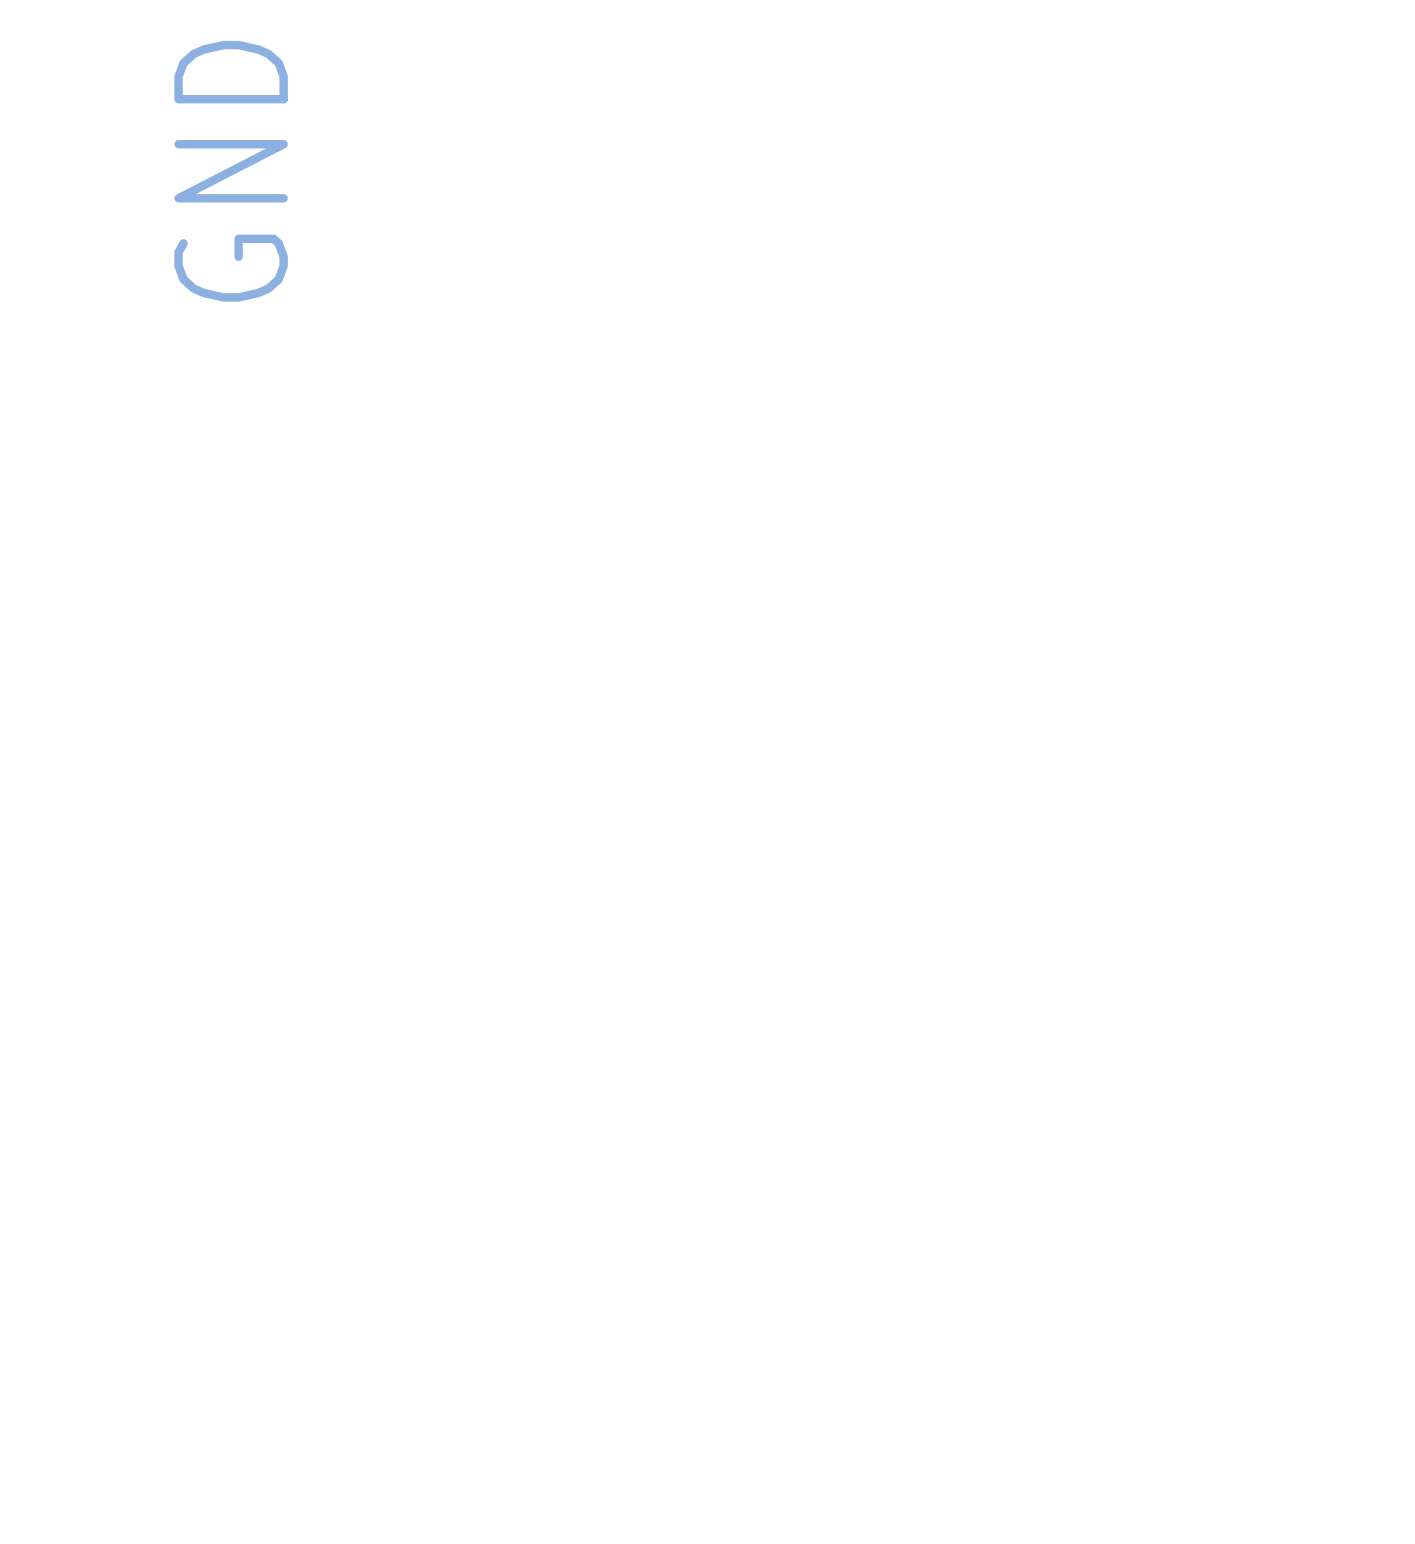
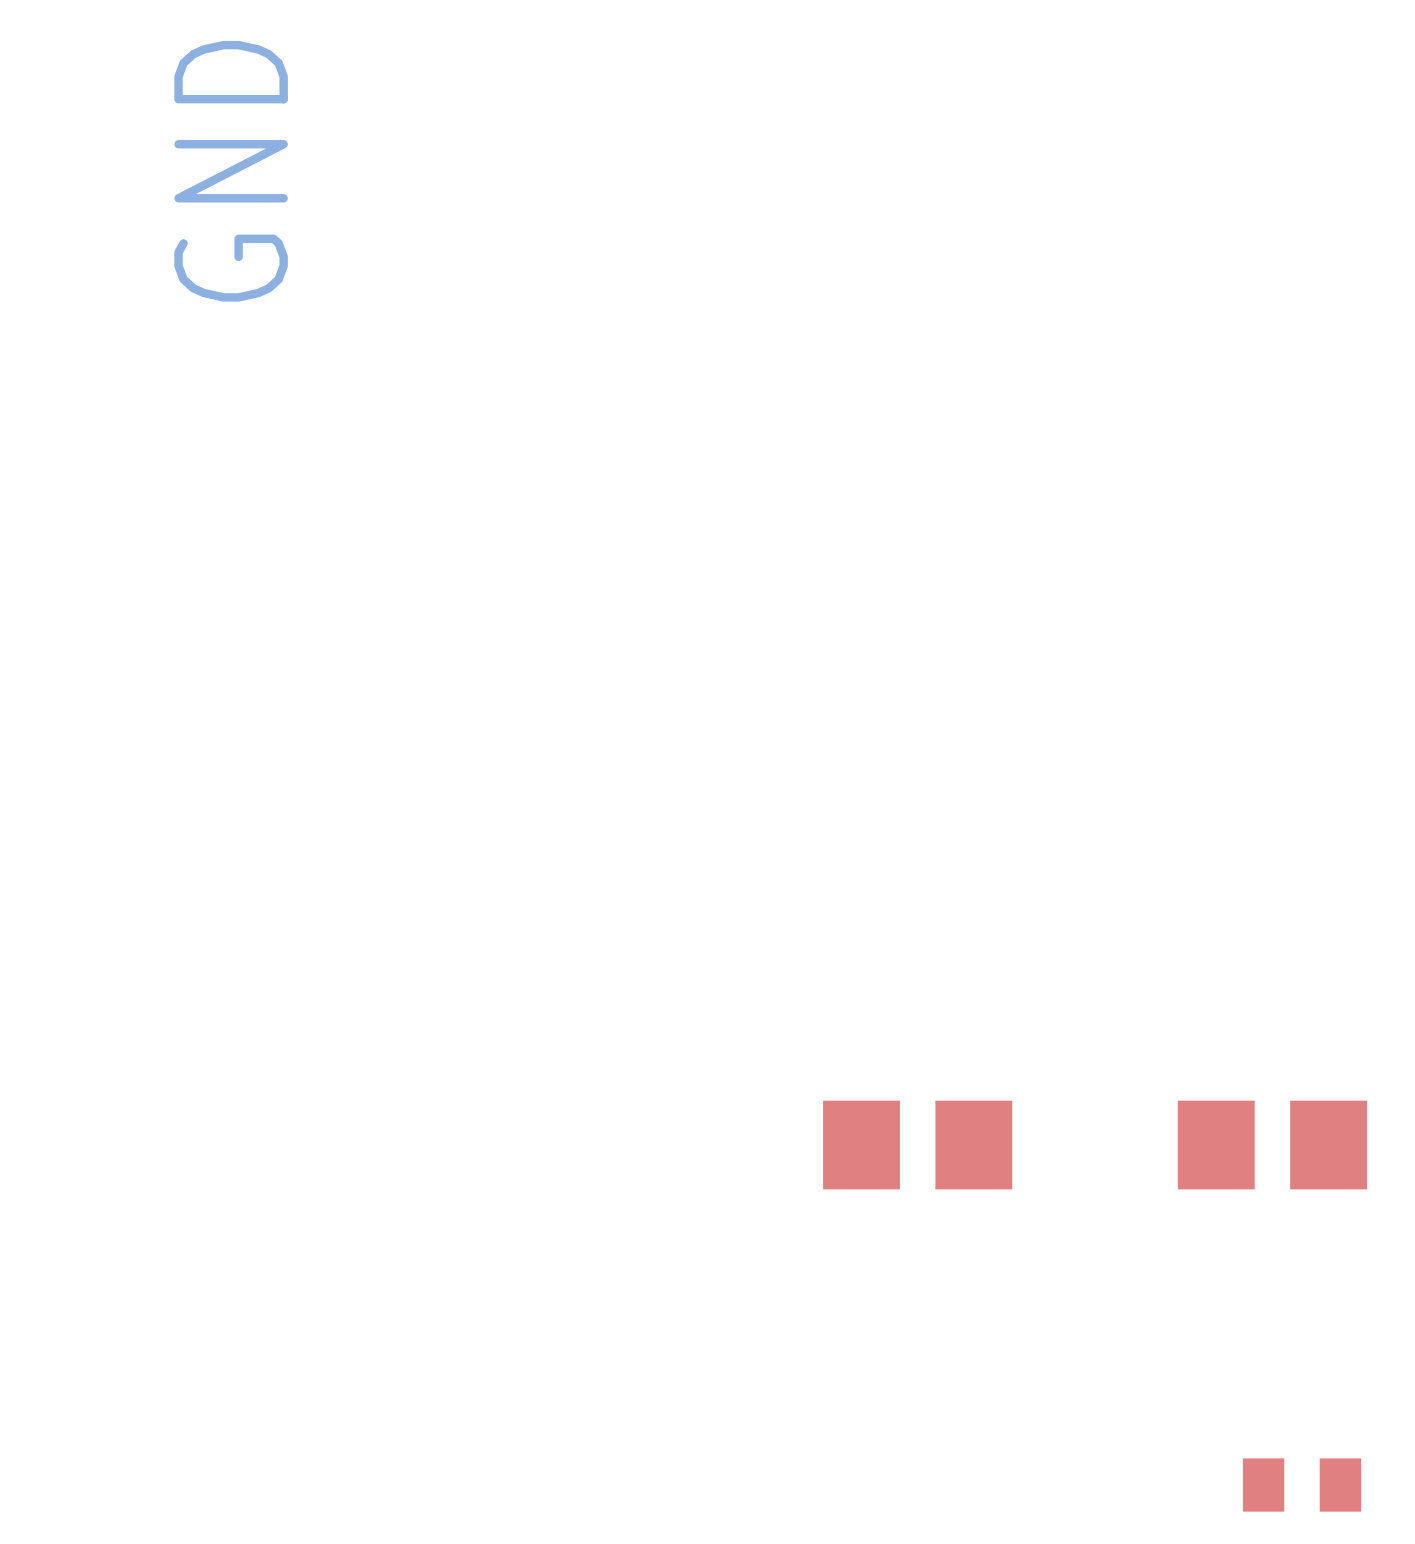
part: none -> (917, 1145)
part: none -> (1272, 1145)
part: none -> (1302, 1485)

